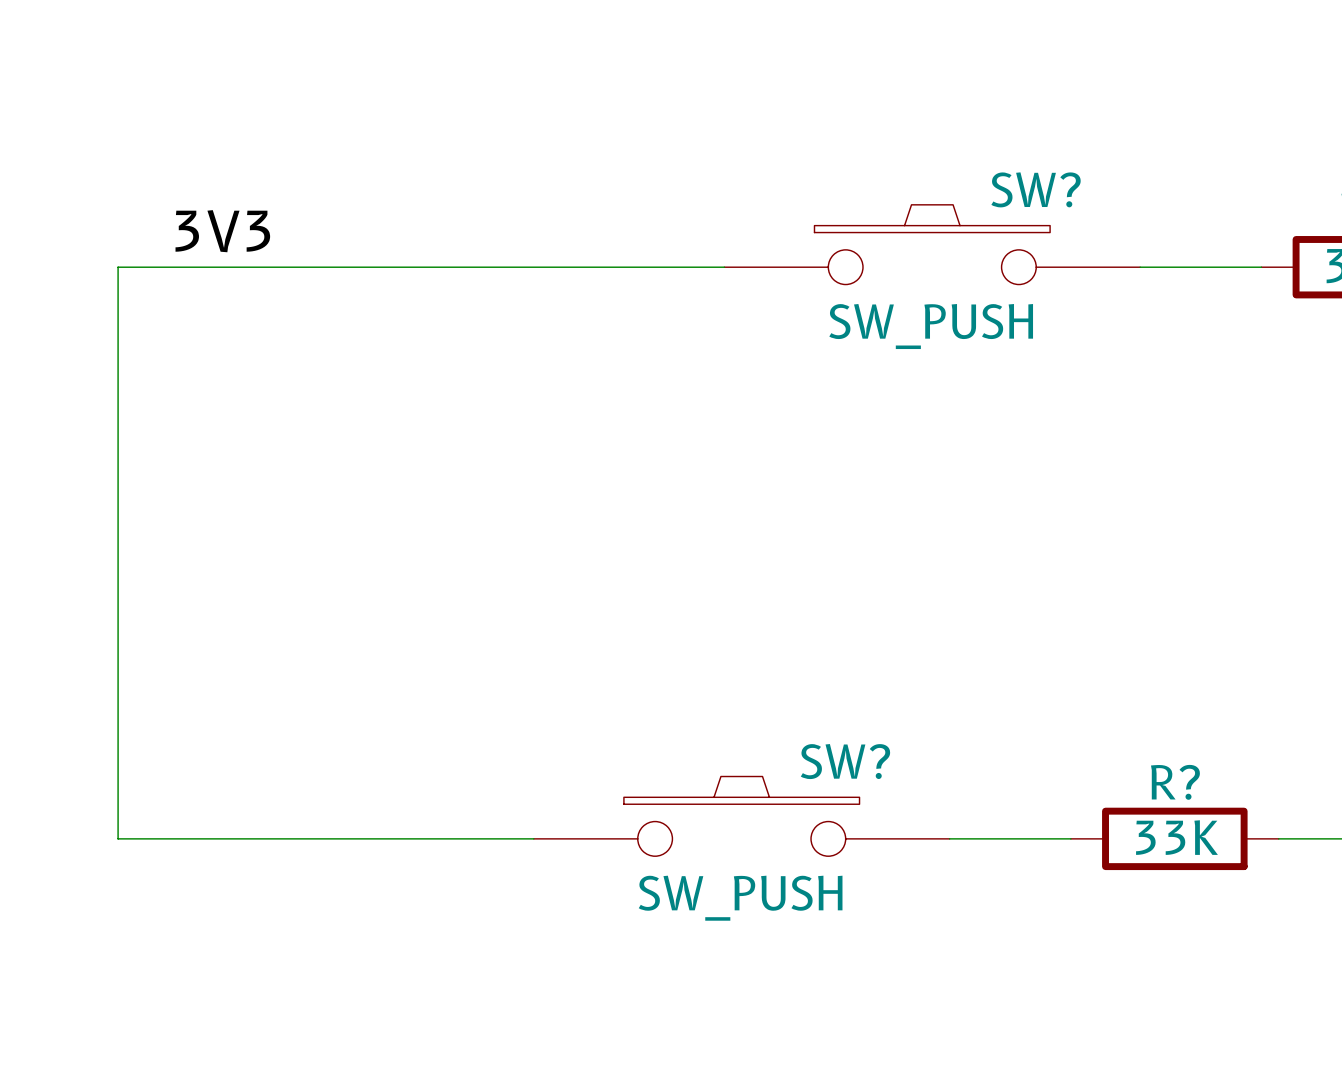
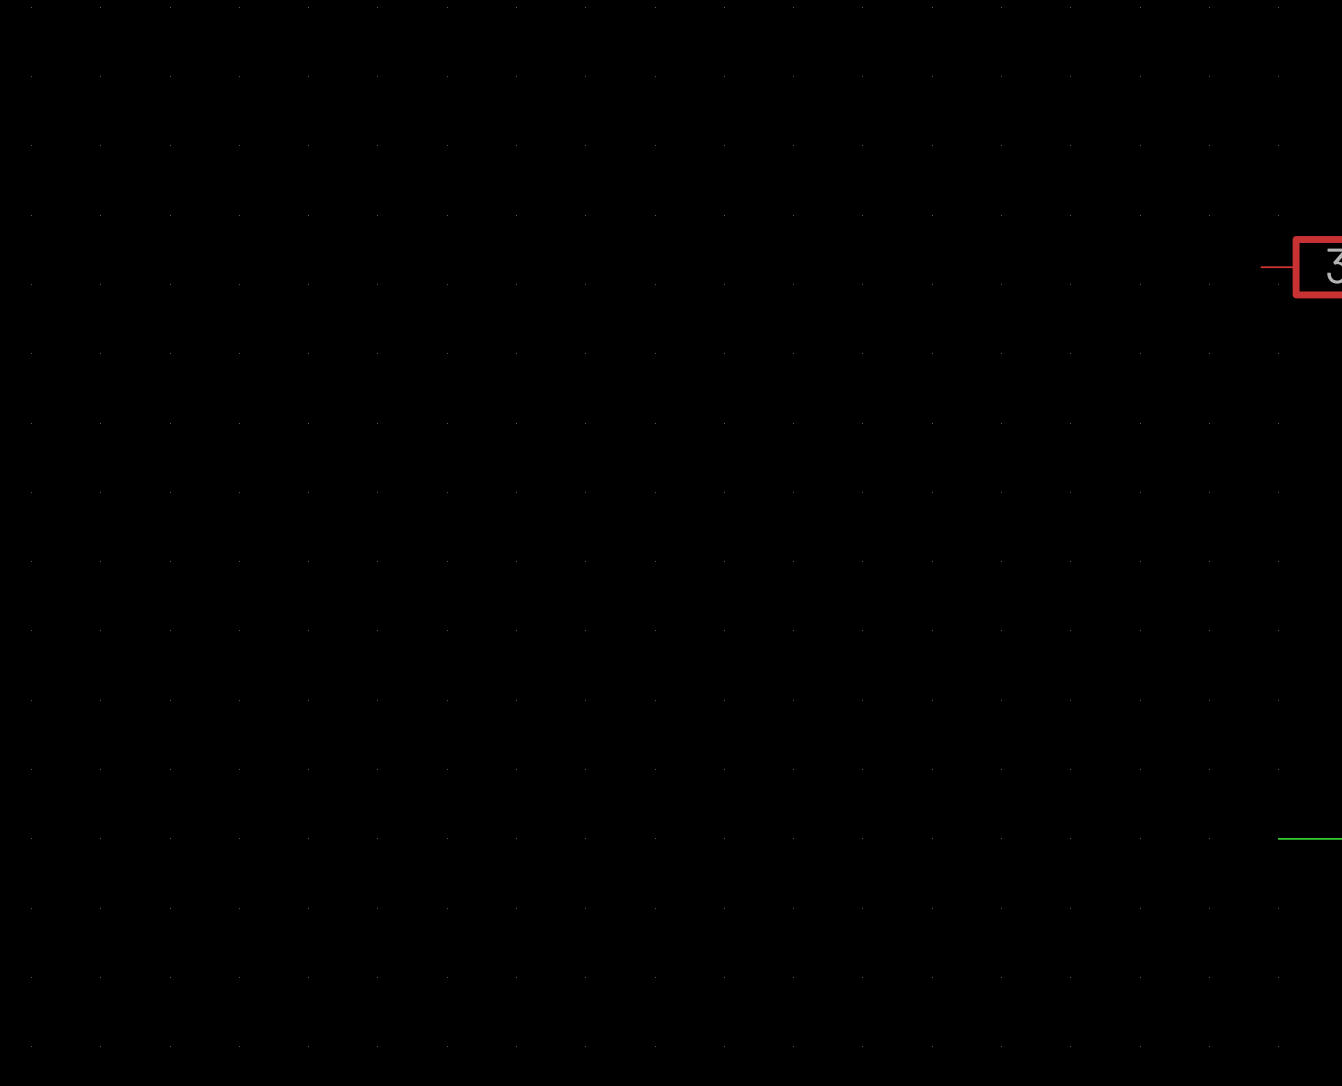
label: 3V3 (222, 231) -> none
SW?: SW_PUSH (932, 244) -> none
wire: (724, 267) (118, 267) (118, 838) (533, 838) -> none
wire: (1140, 267) (1261, 267) -> none
SW?: SW_PUSH (741, 816) -> none
wire: (949, 838) (1070, 838) -> none
R?: 33K (1174, 838) -> none

